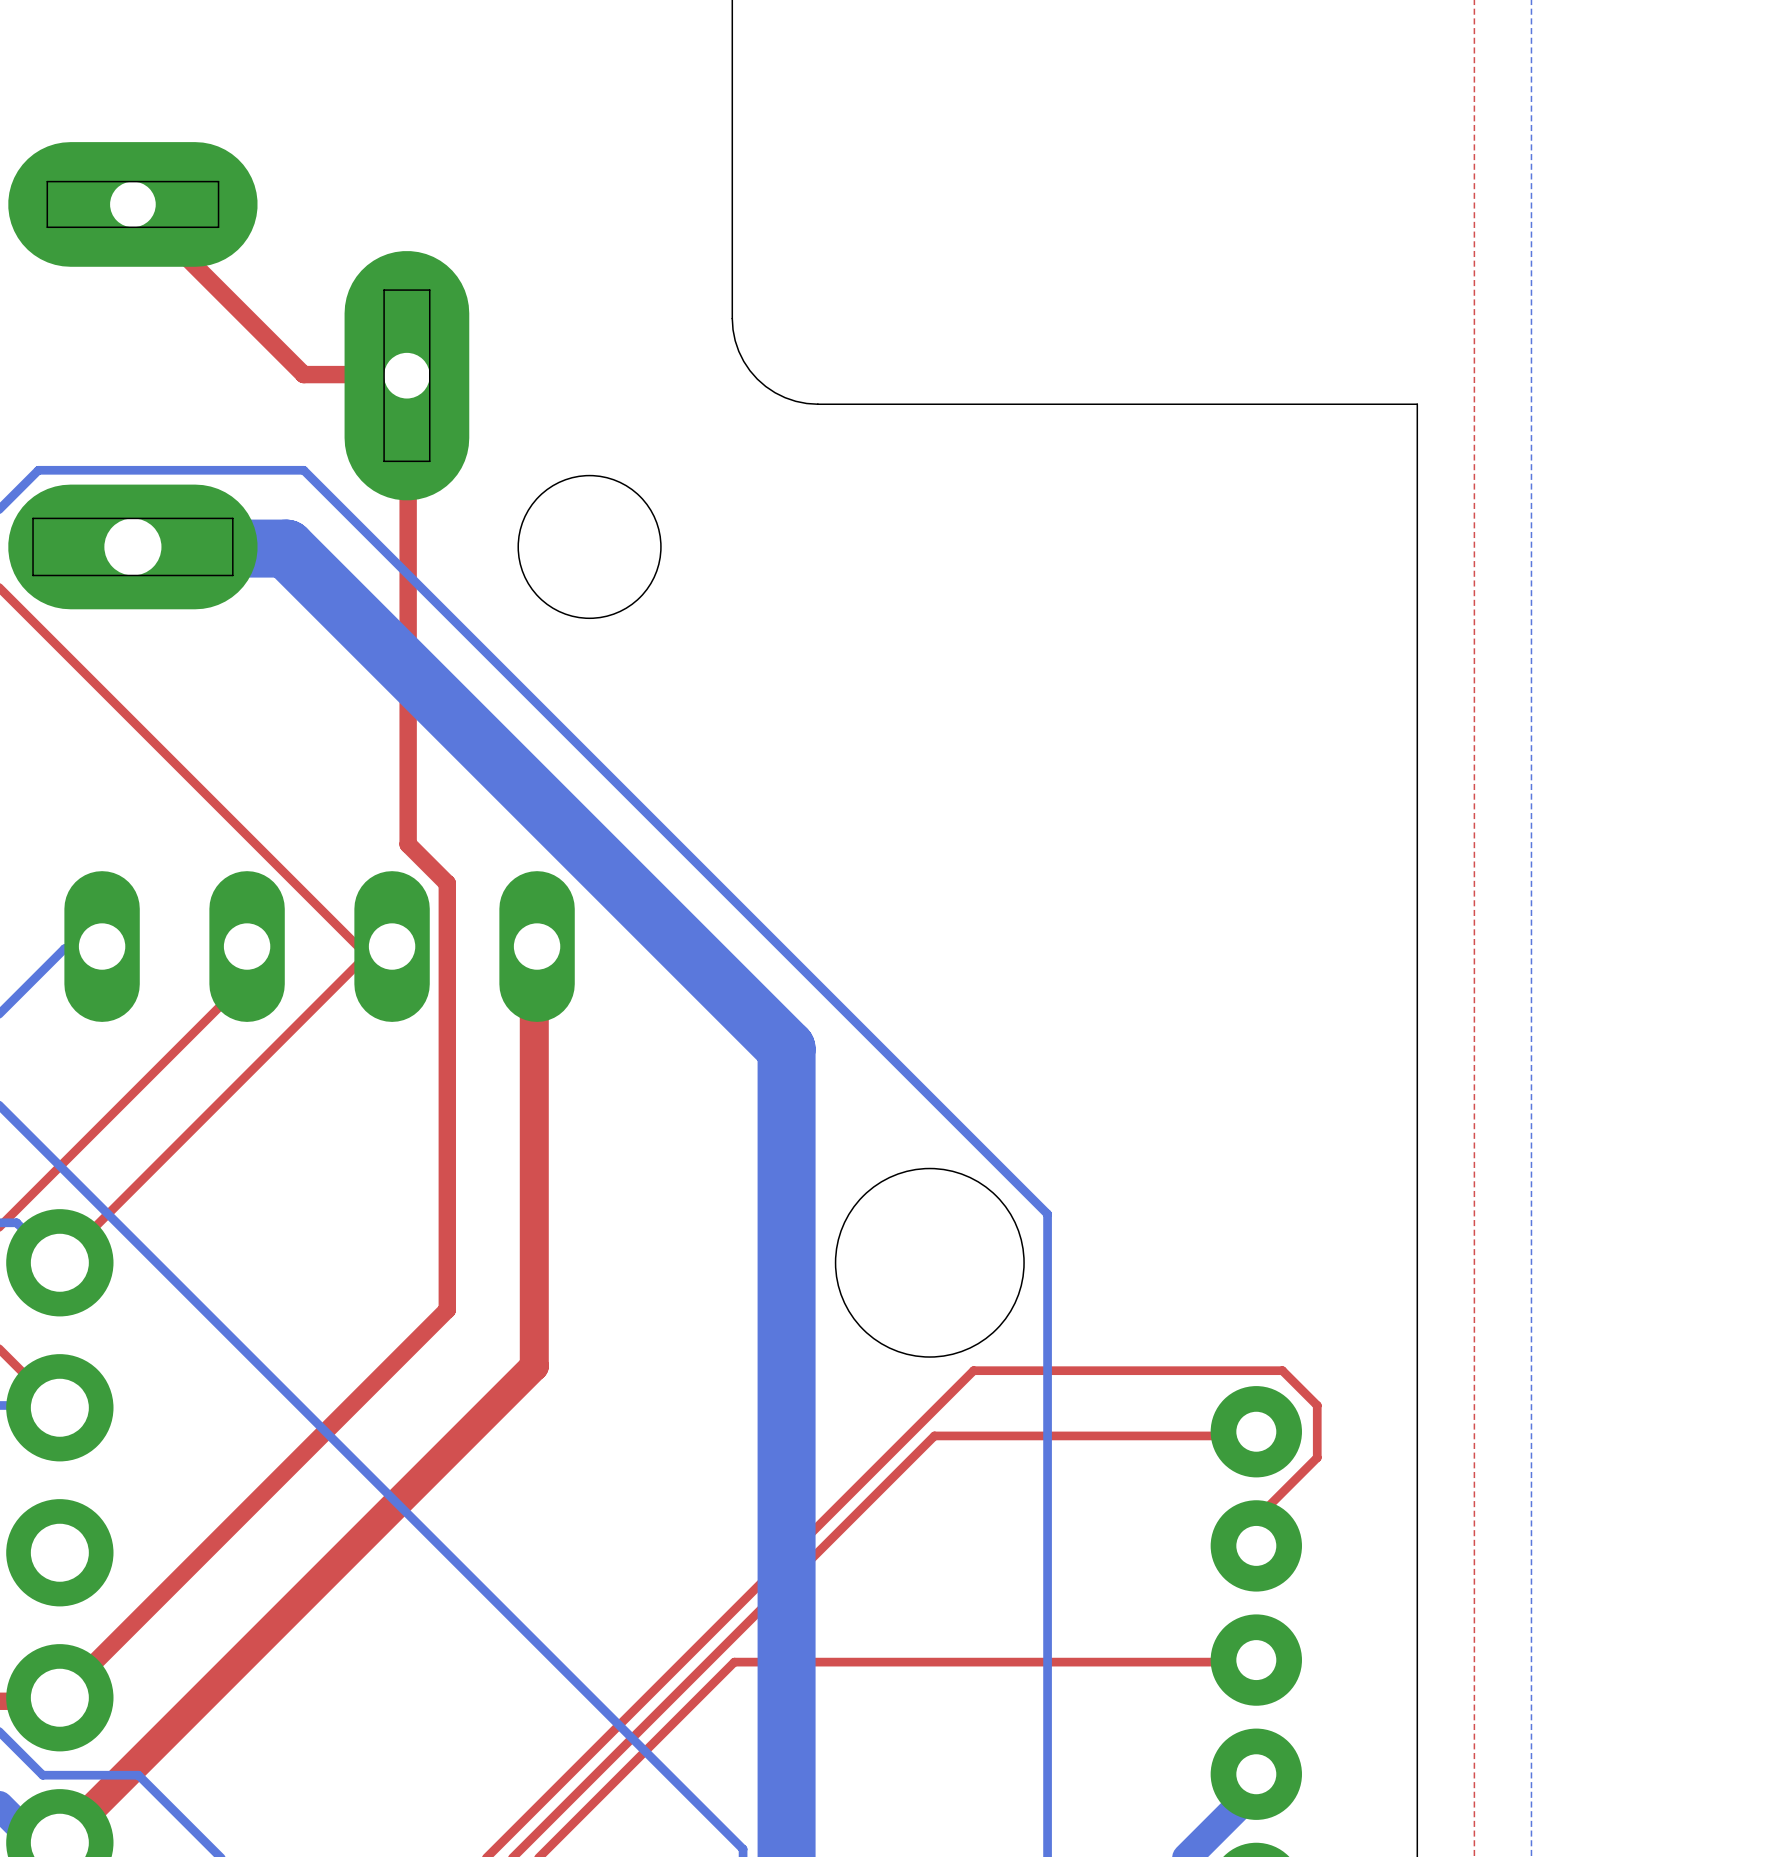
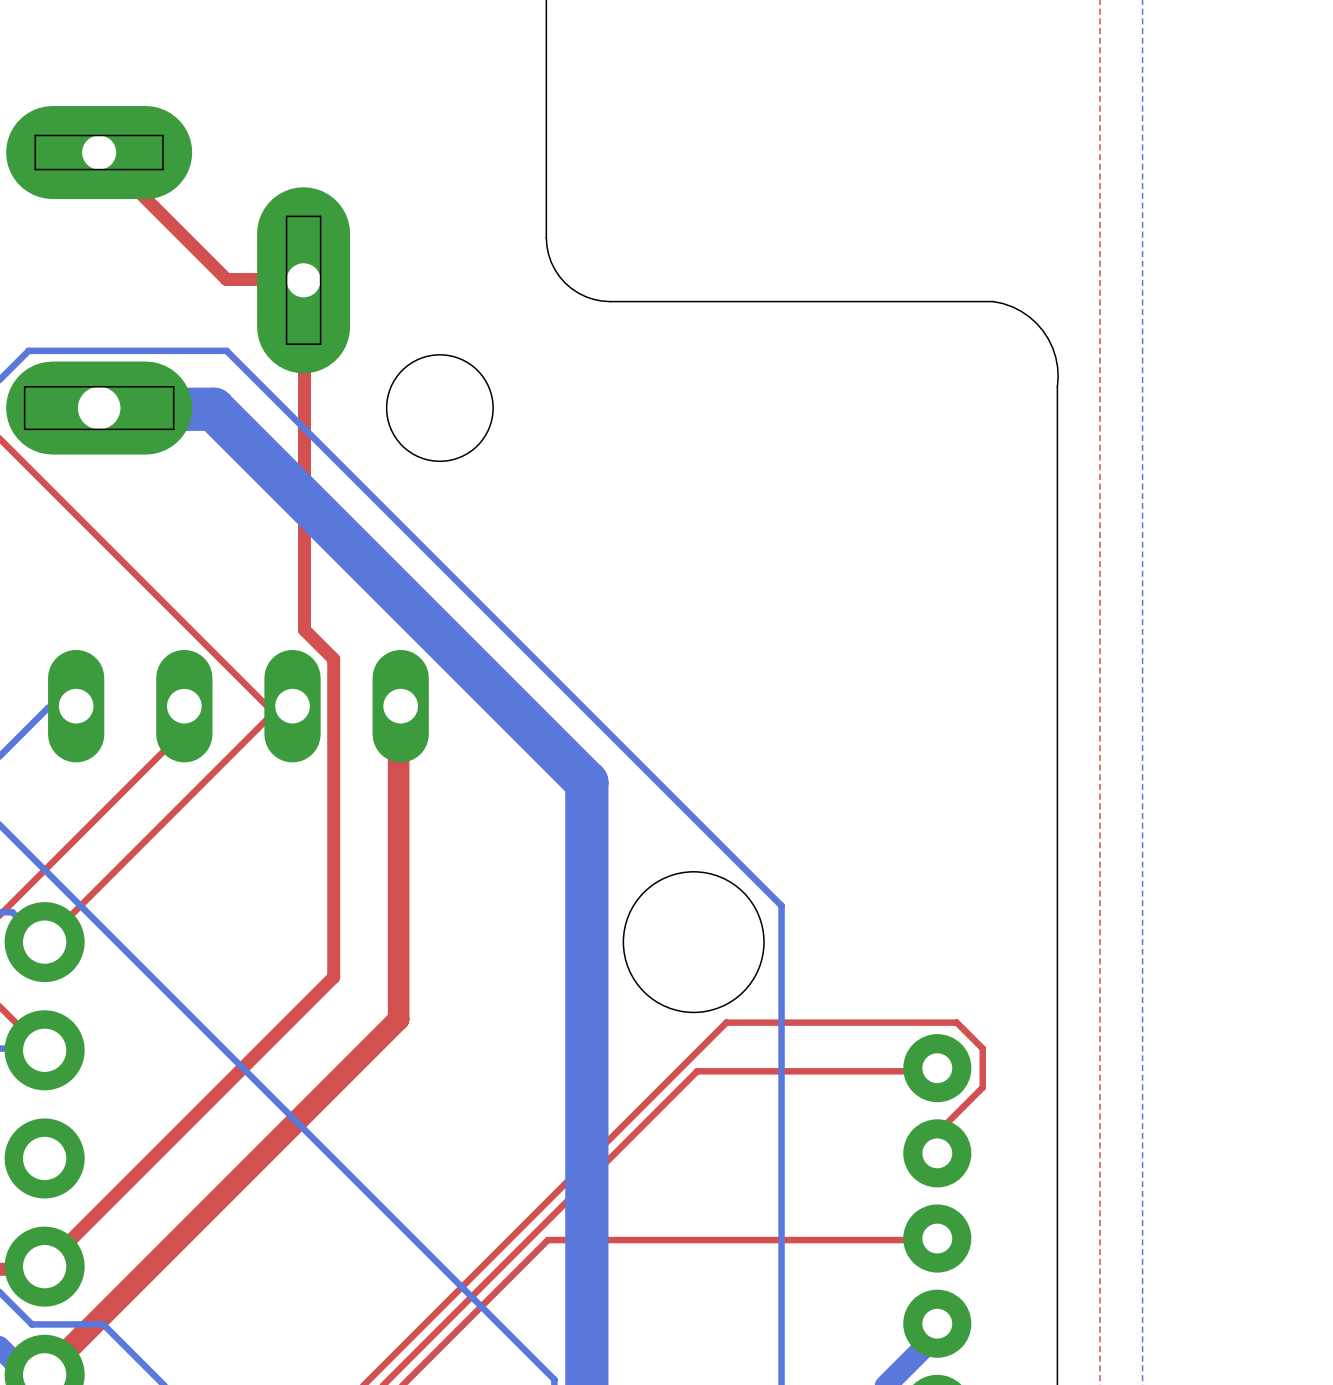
board edge: (1331, 404) (1417, 404) (1417, 518) -> (993, 301) (1021, 311) (1043, 330) (1055, 357) (1057, 386)

